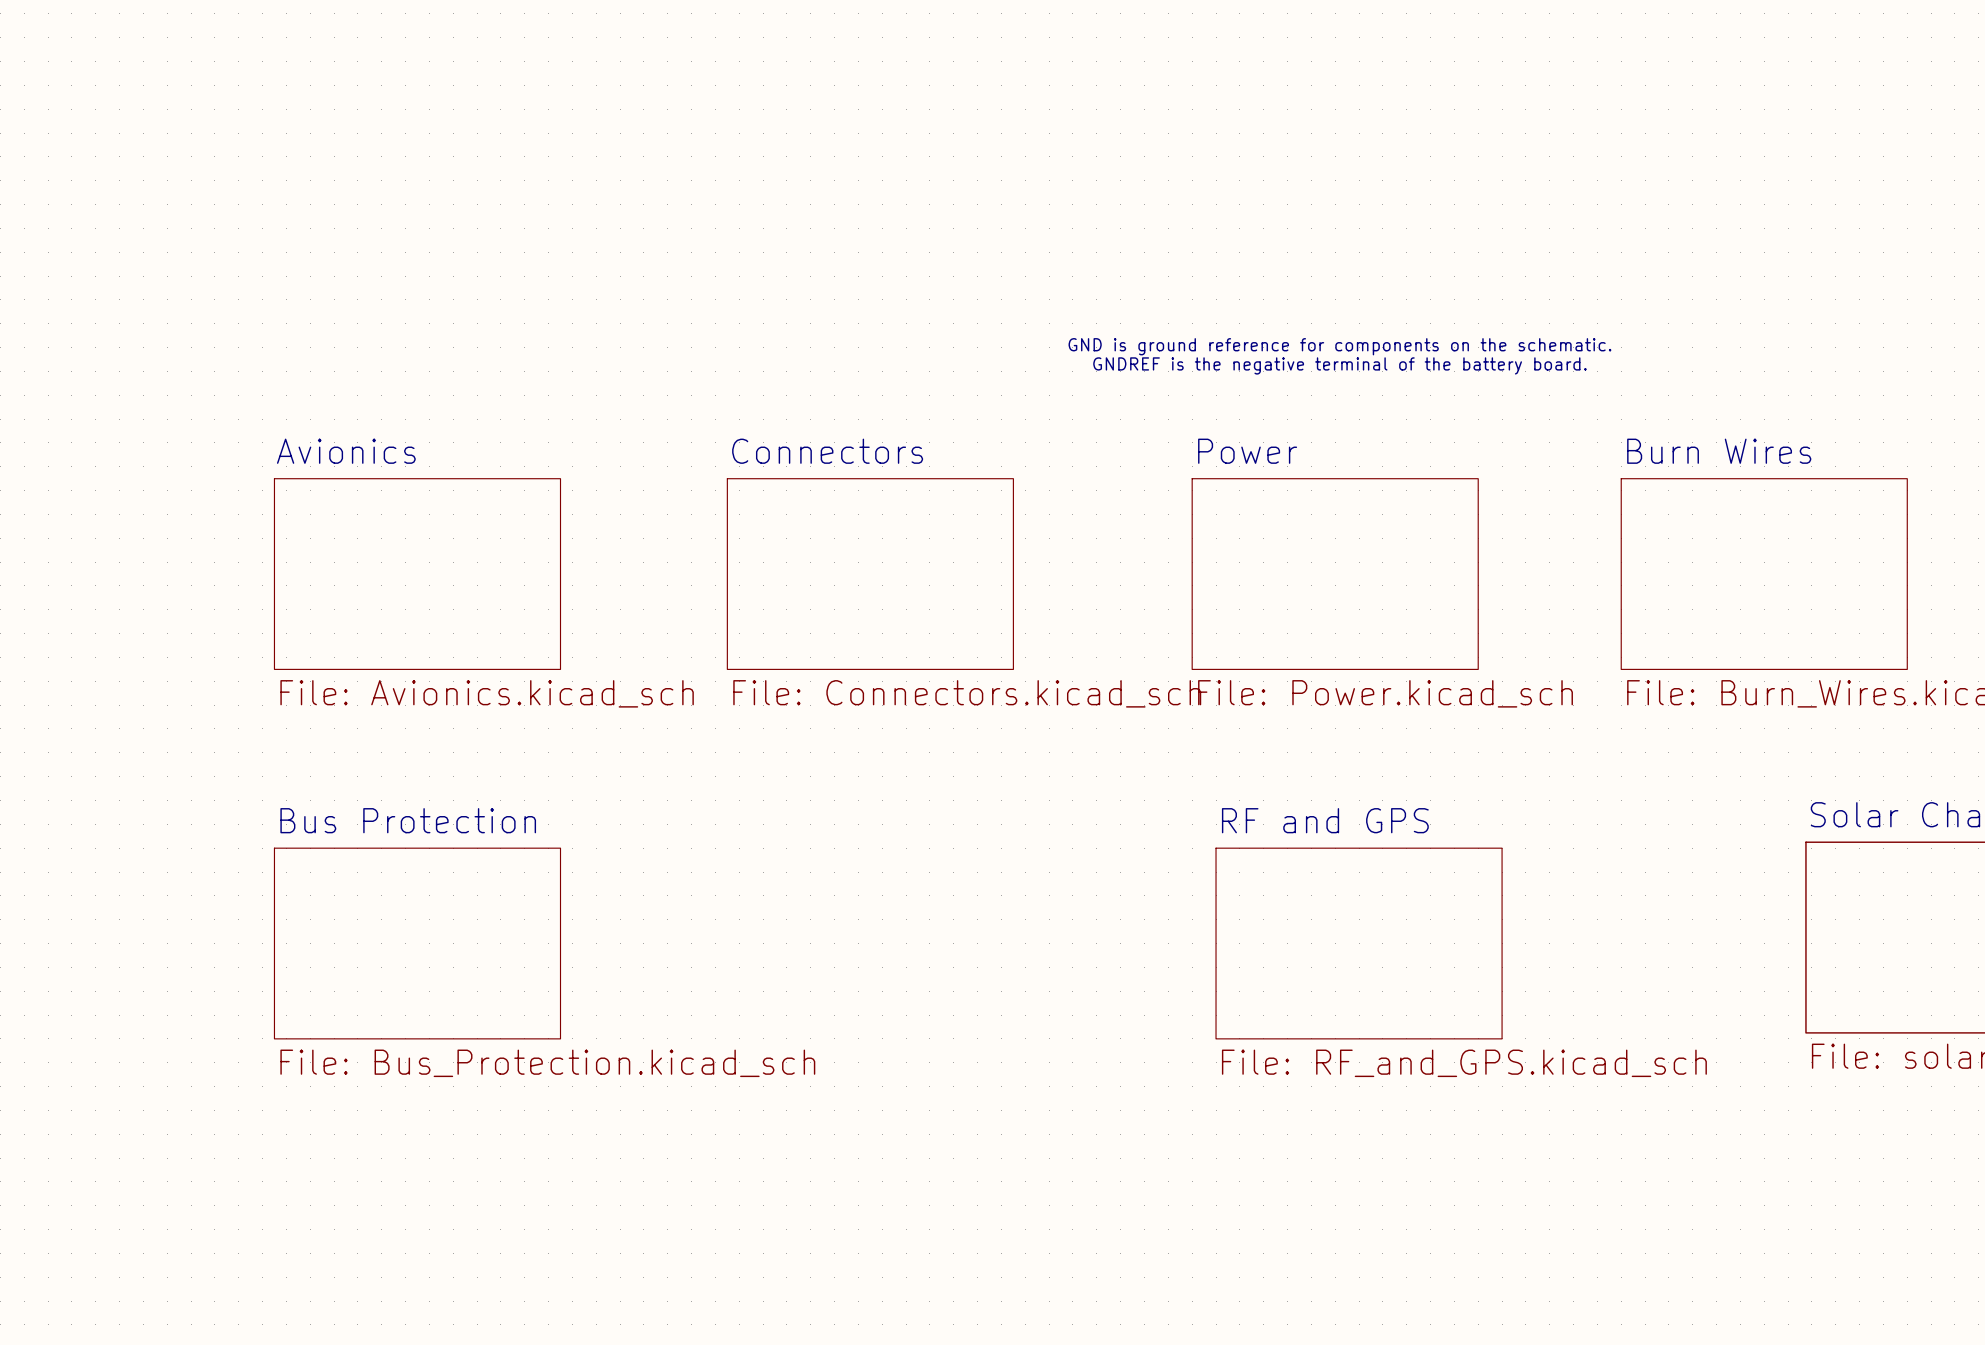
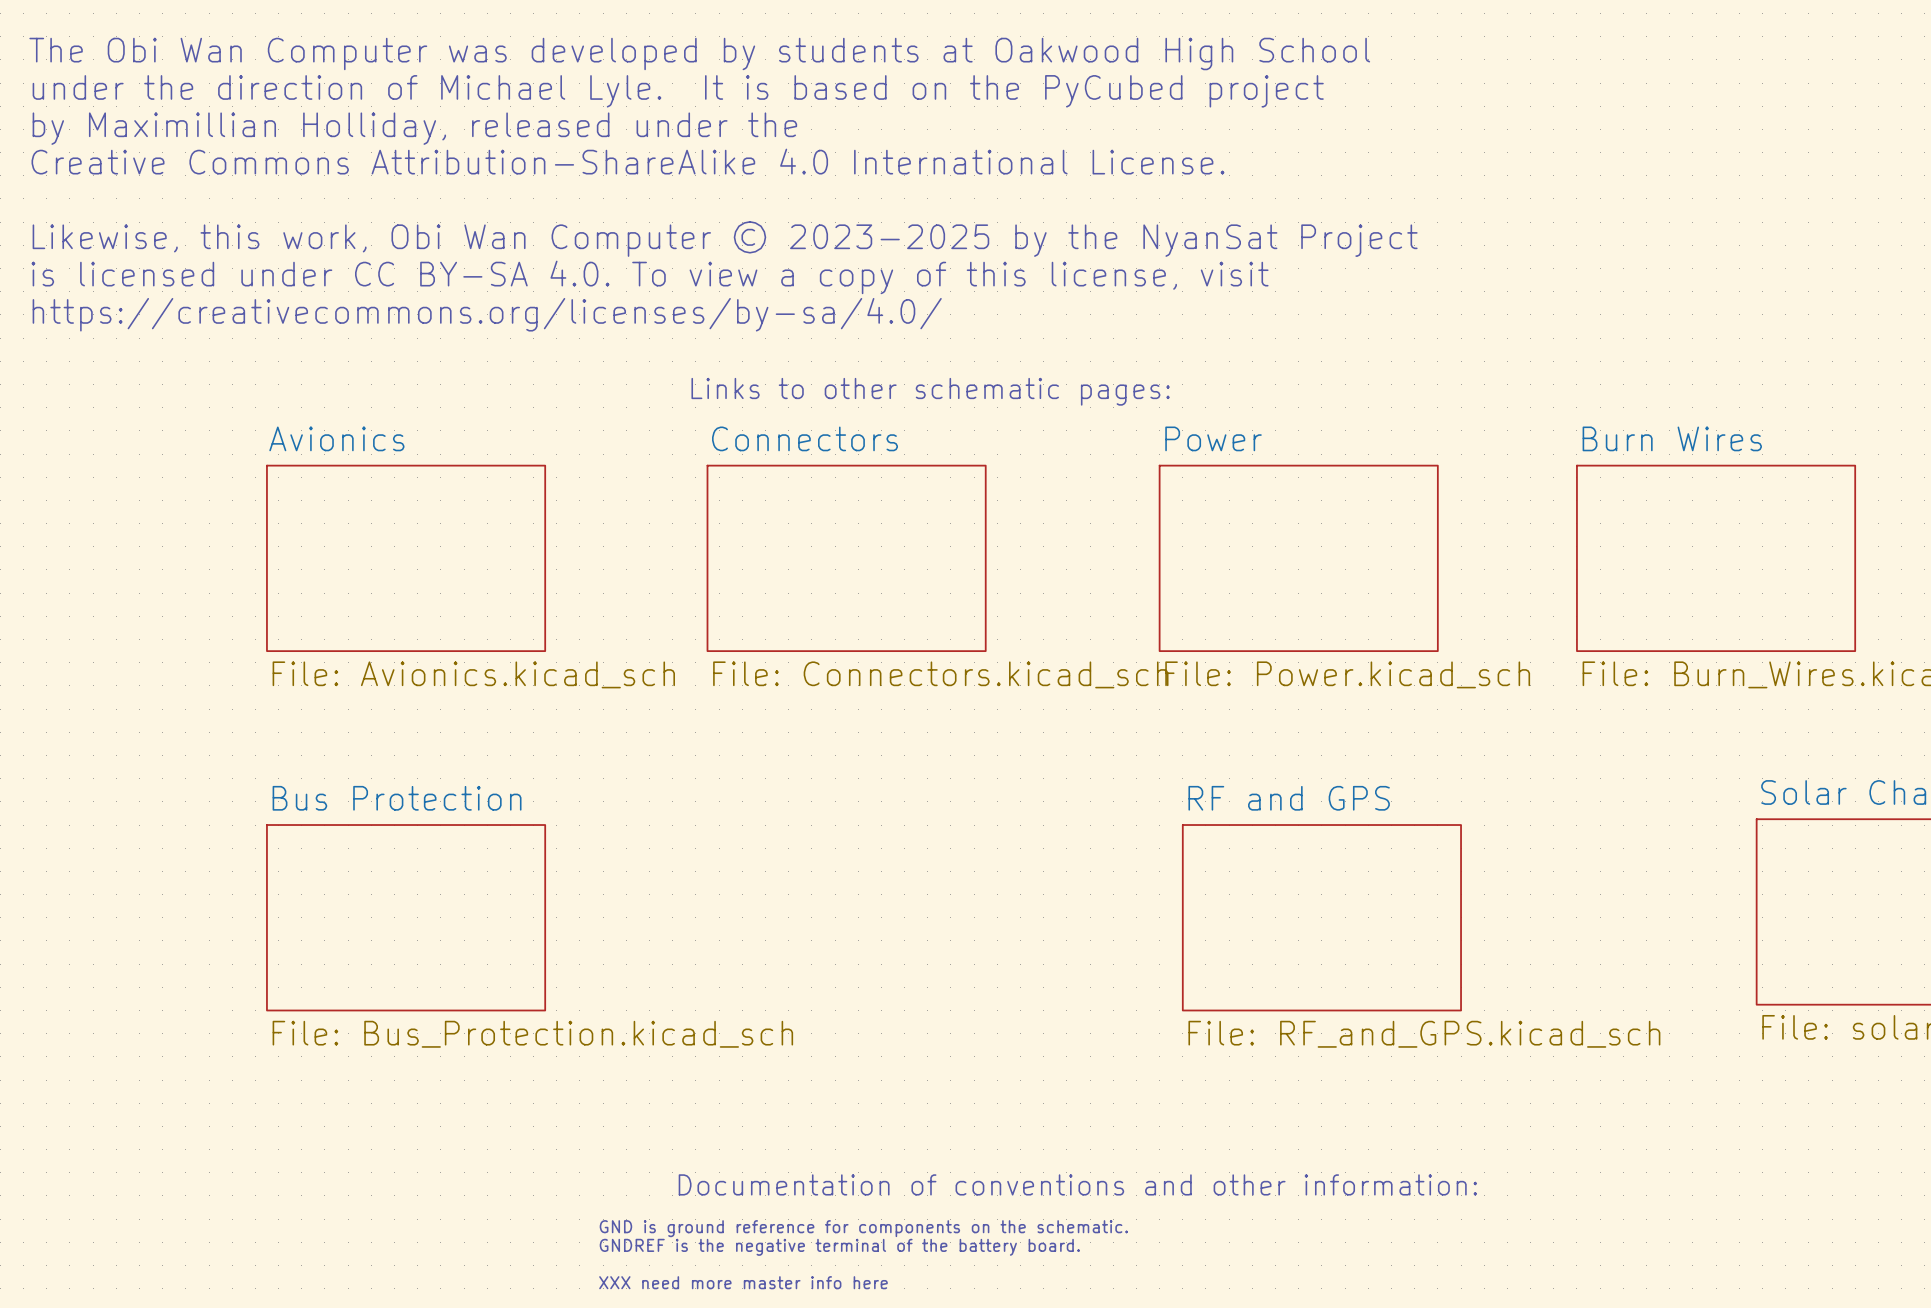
text: none -> The Obi Wan Computer was developed by students at Oakwood High School (699, 53)
text: none -> under the direction of Michael Lyle. It is based on the PyCubed project (678, 91)
text: none -> by Maximillian Holliday, released under the (414, 128)
text: none -> Creative Commons Attribution-ShareAlike 4.0 International License. (627, 161)
text: none -> Likewise, this work, Obi Wan Computer © 2023-2025 by the NyanSat Project (725, 238)
text: none -> is licensed under CC BY-SA 4.0. To view a copy of this license, visit (650, 277)
text: none -> https://creativecommons.org/licenses/by-sa/4.0/ (487, 314)
text: GND is ground reference for components on the schematic. (1339, 346) -> none
text: GNDREF is the negative terminal of the battery board. (1339, 365) -> none
text: none -> Links to other schematic pages: (930, 391)
text: none -> Documentation of conventions and other information: (1077, 1184)
text: none -> GND is ground reference for components on the schematic. (863, 1228)
text: none -> GNDREF is the negative terminal of the battery board. (839, 1247)
text: none -> XXX need more master info here (743, 1282)

